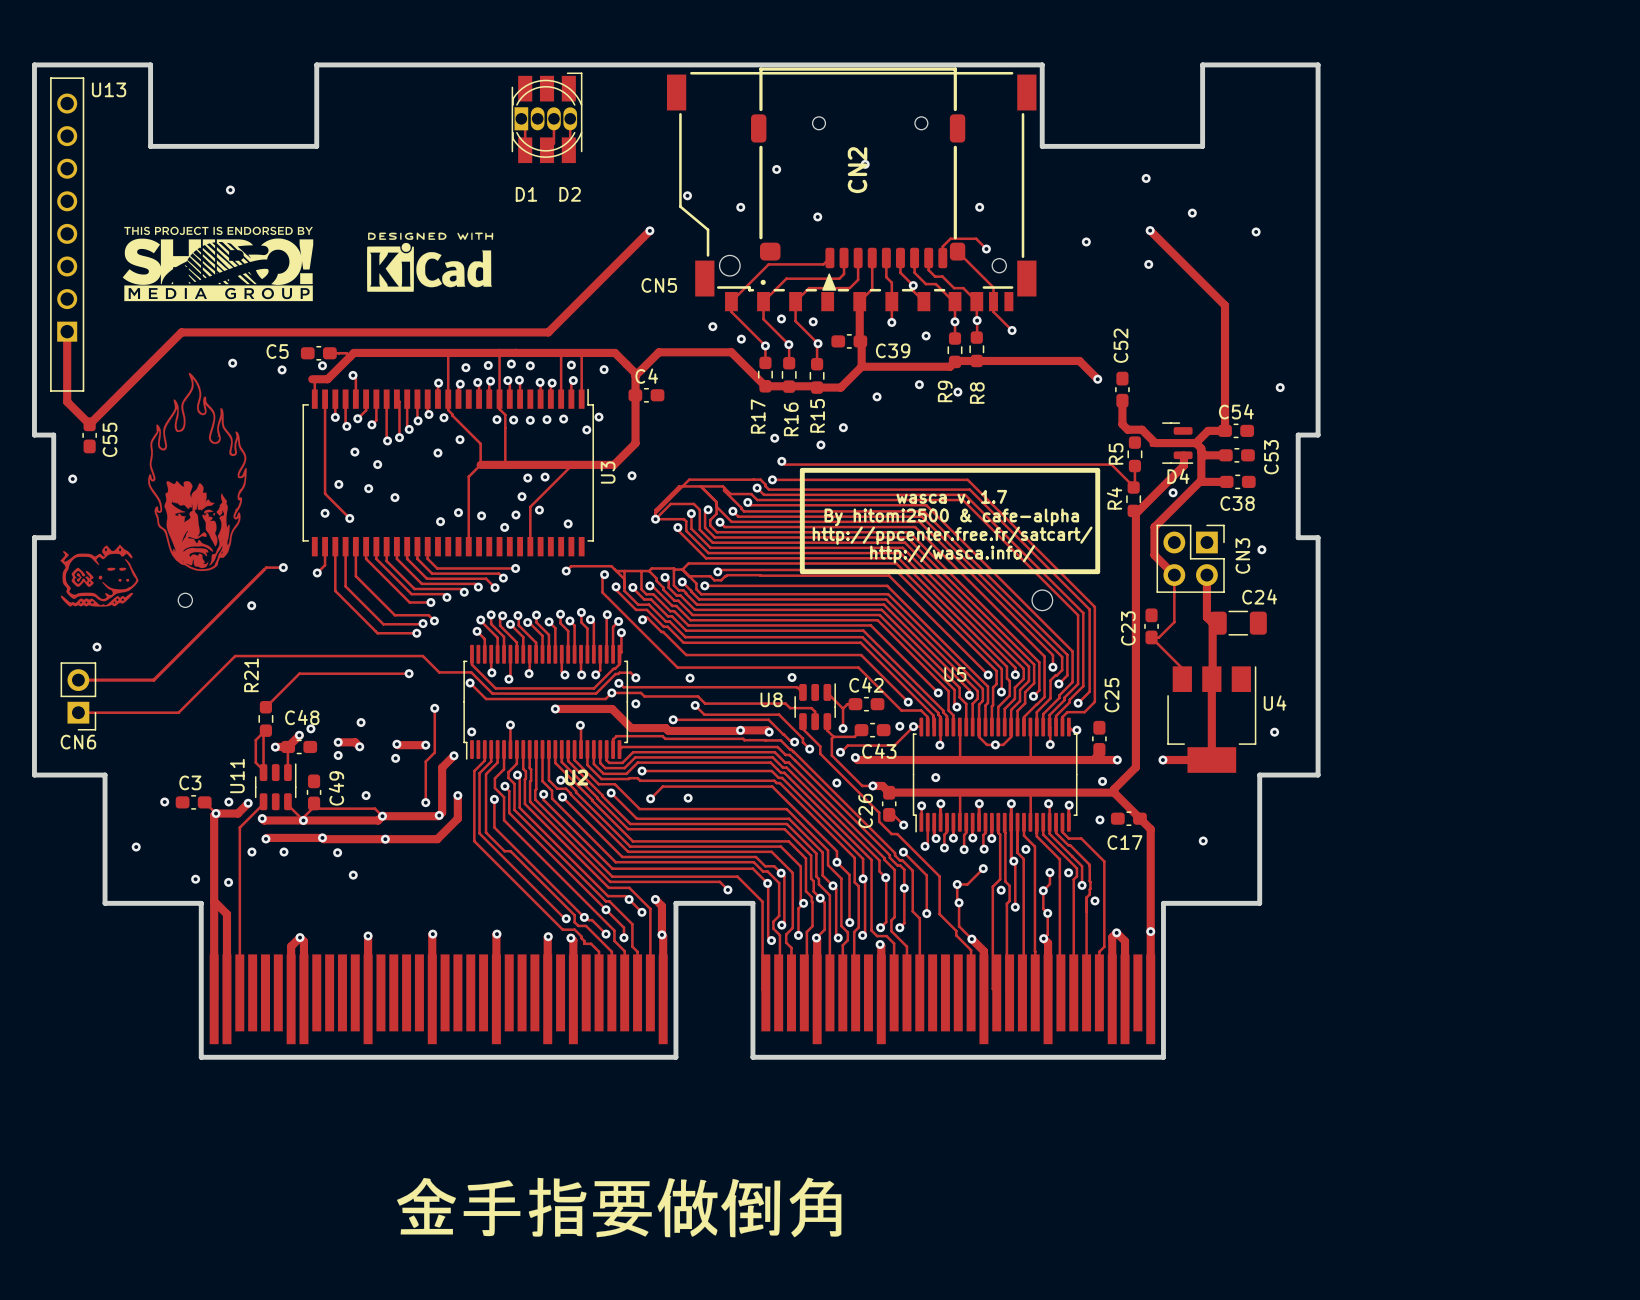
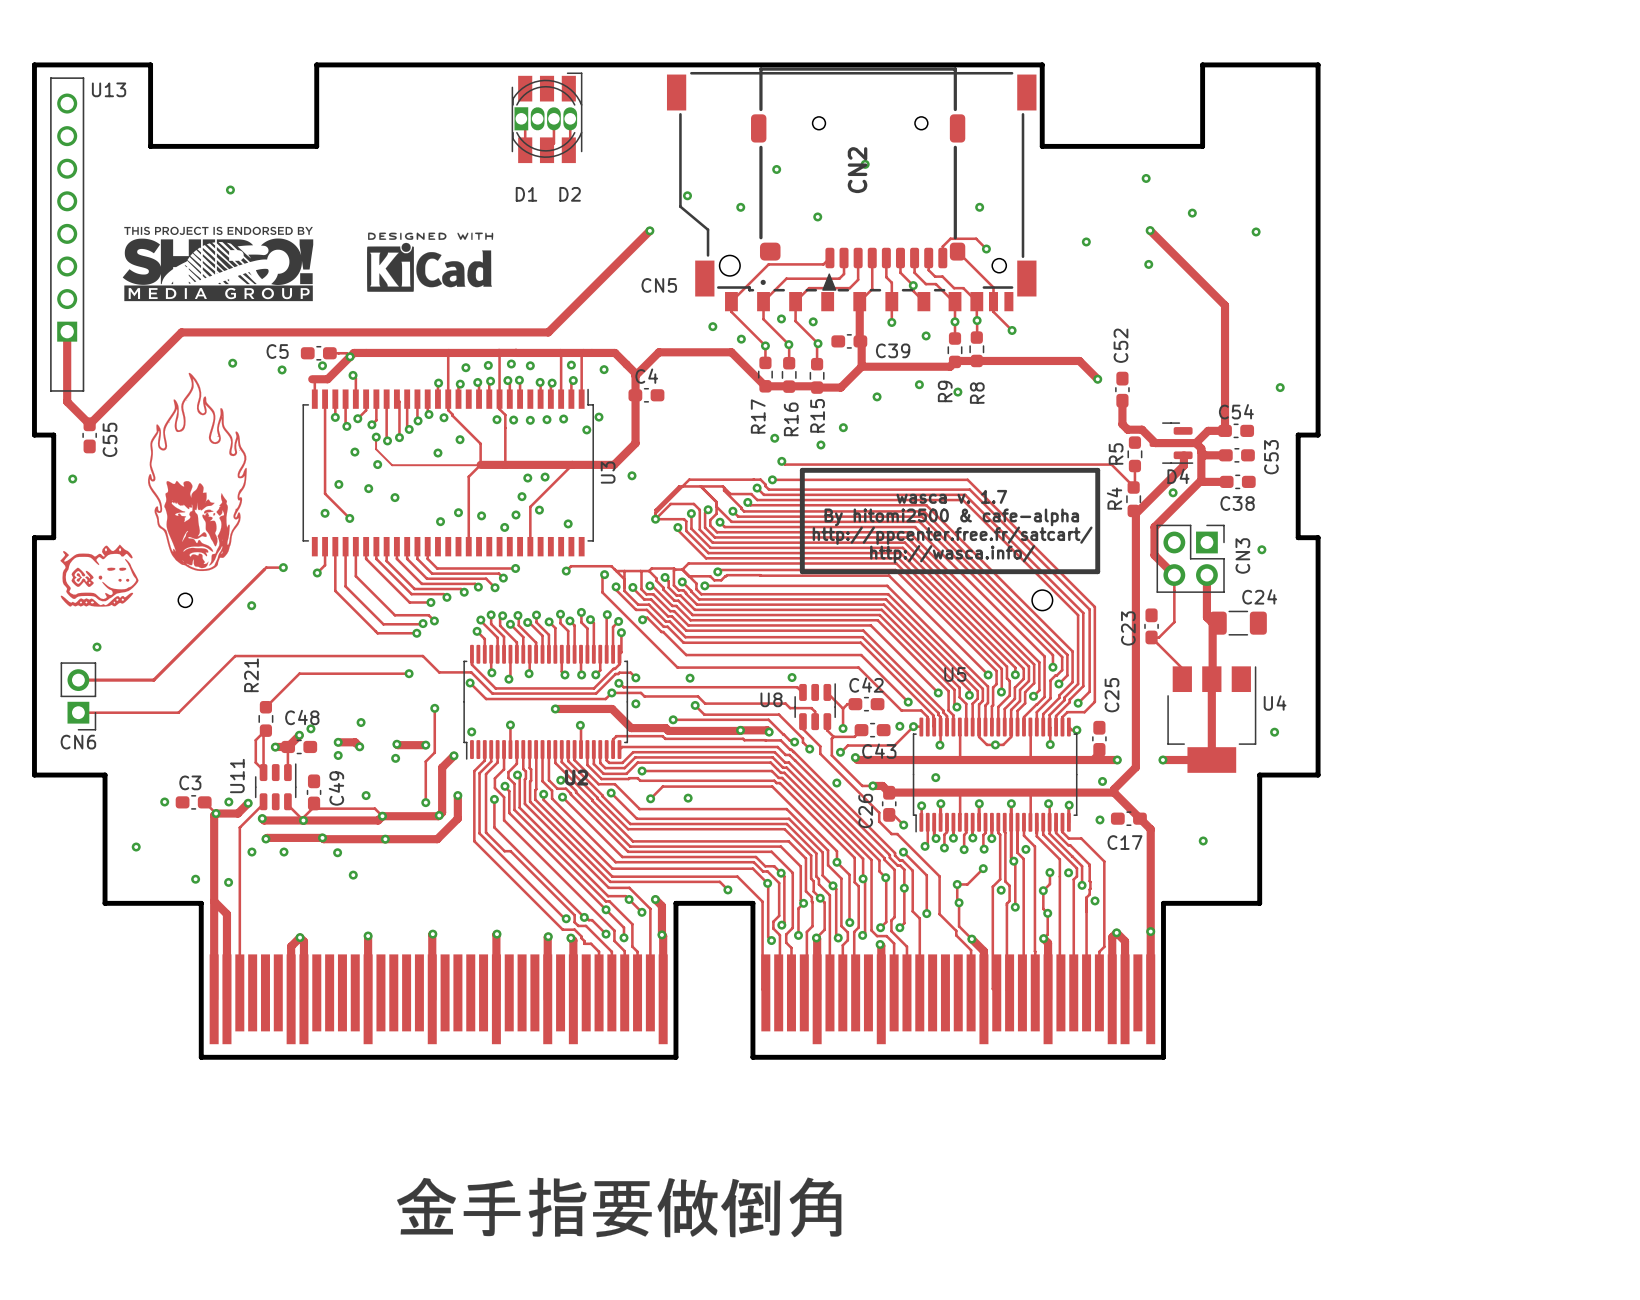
via: none -> (350, 356)
track: none -> (376, 437) (376, 449) (392, 465) (480, 464)
via: none -> (376, 437)

